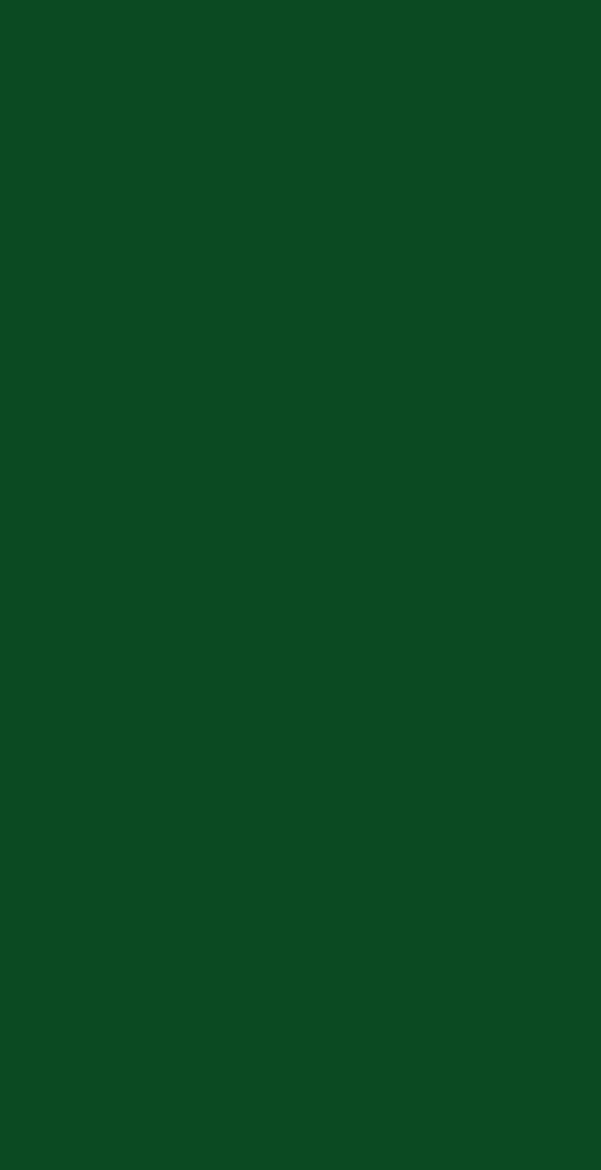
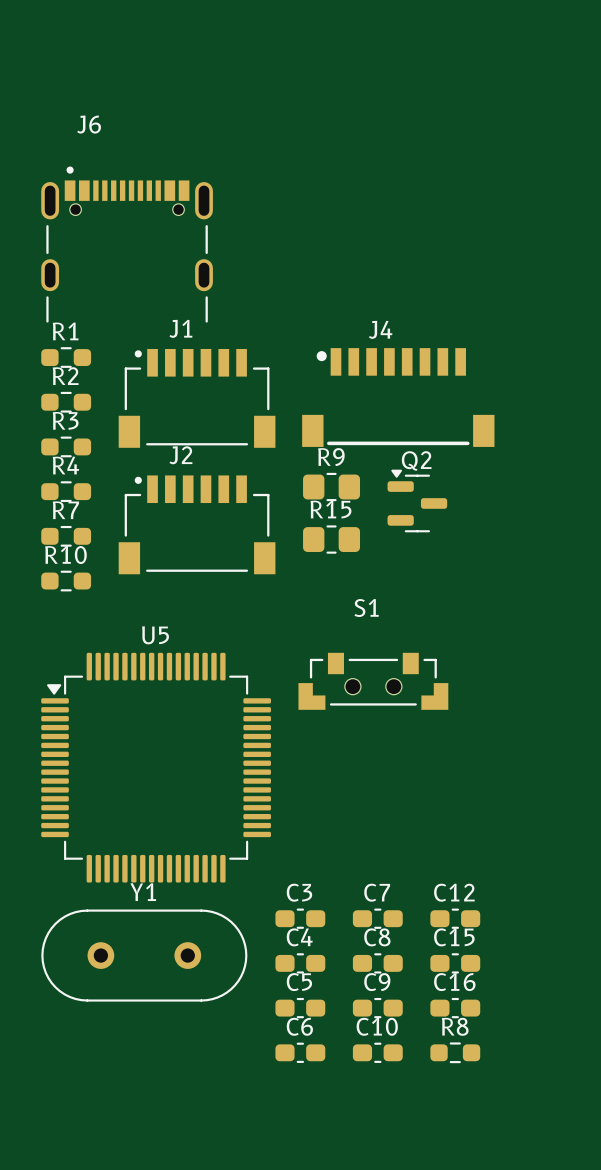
J6: none -> (127, 244)
R1: none -> (66, 357)
J4: none -> (398, 397)
J1: none -> (197, 398)
R2: none -> (66, 402)
R3: none -> (66, 446)
R9: none -> (331, 487)
R4: none -> (66, 491)
Q2: none -> (417, 500)
J2: none -> (197, 524)
R7: none -> (66, 536)
R15: none -> (331, 539)
R10: none -> (66, 581)
S1: none -> (373, 681)
U5: none -> (156, 767)
C3: none -> (300, 918)
C7: none -> (377, 918)
C12: none -> (455, 918)
Y1: none -> (144, 955)
C4: none -> (300, 963)
C8: none -> (377, 963)
C15: none -> (455, 963)
C5: none -> (300, 1008)
C9: none -> (377, 1008)
C16: none -> (455, 1008)
C6: none -> (300, 1052)
C10: none -> (377, 1052)
R8: none -> (455, 1052)

